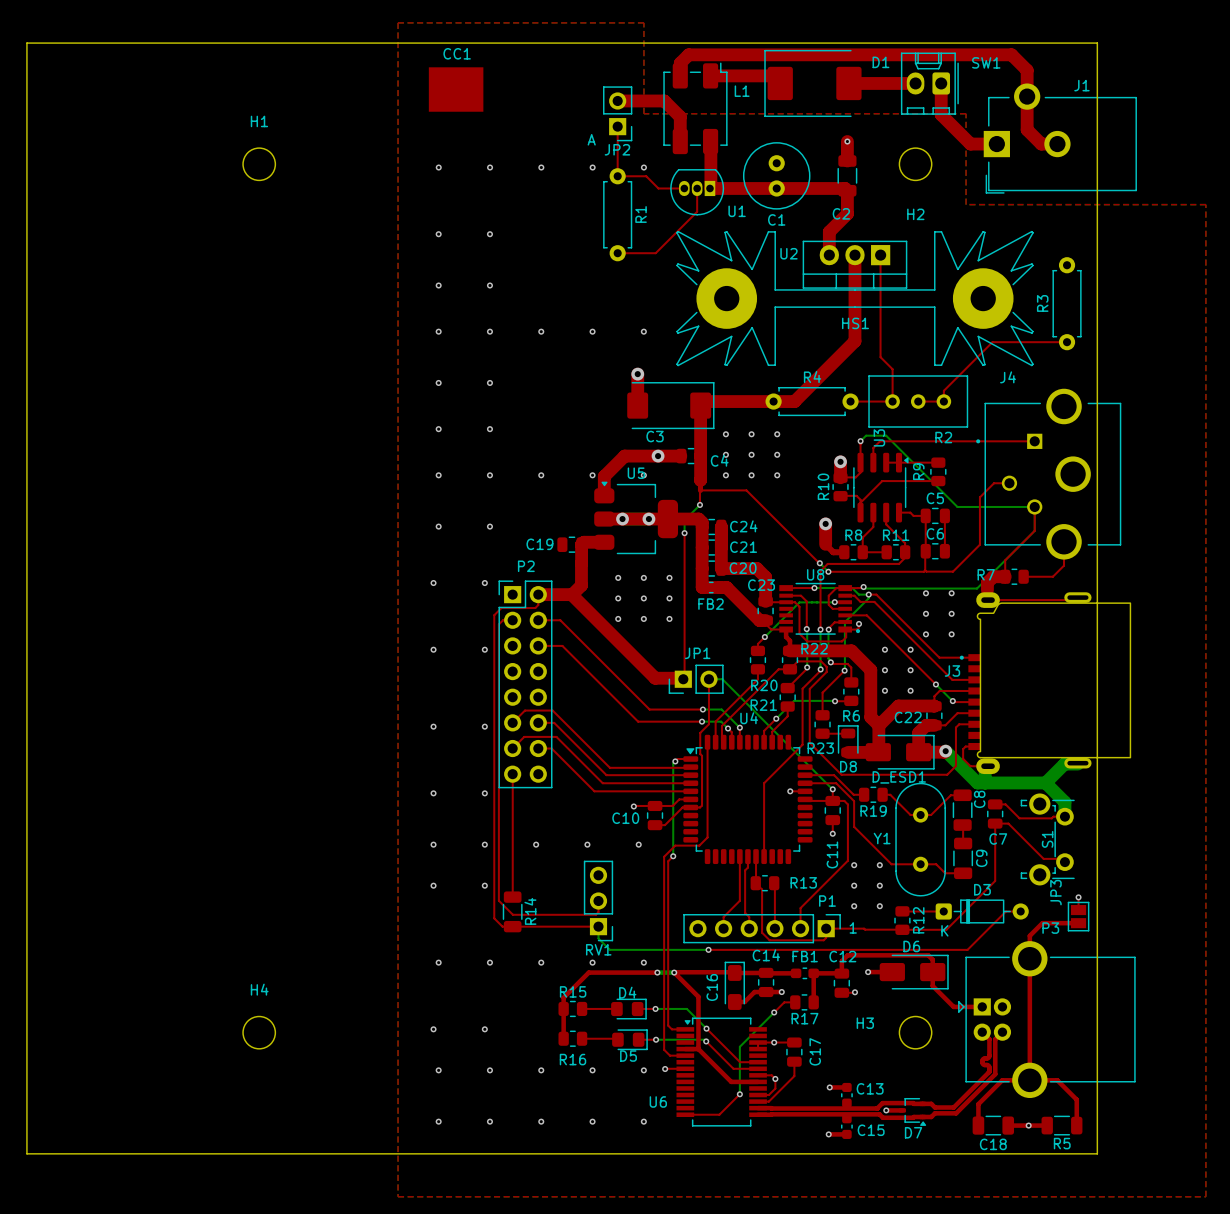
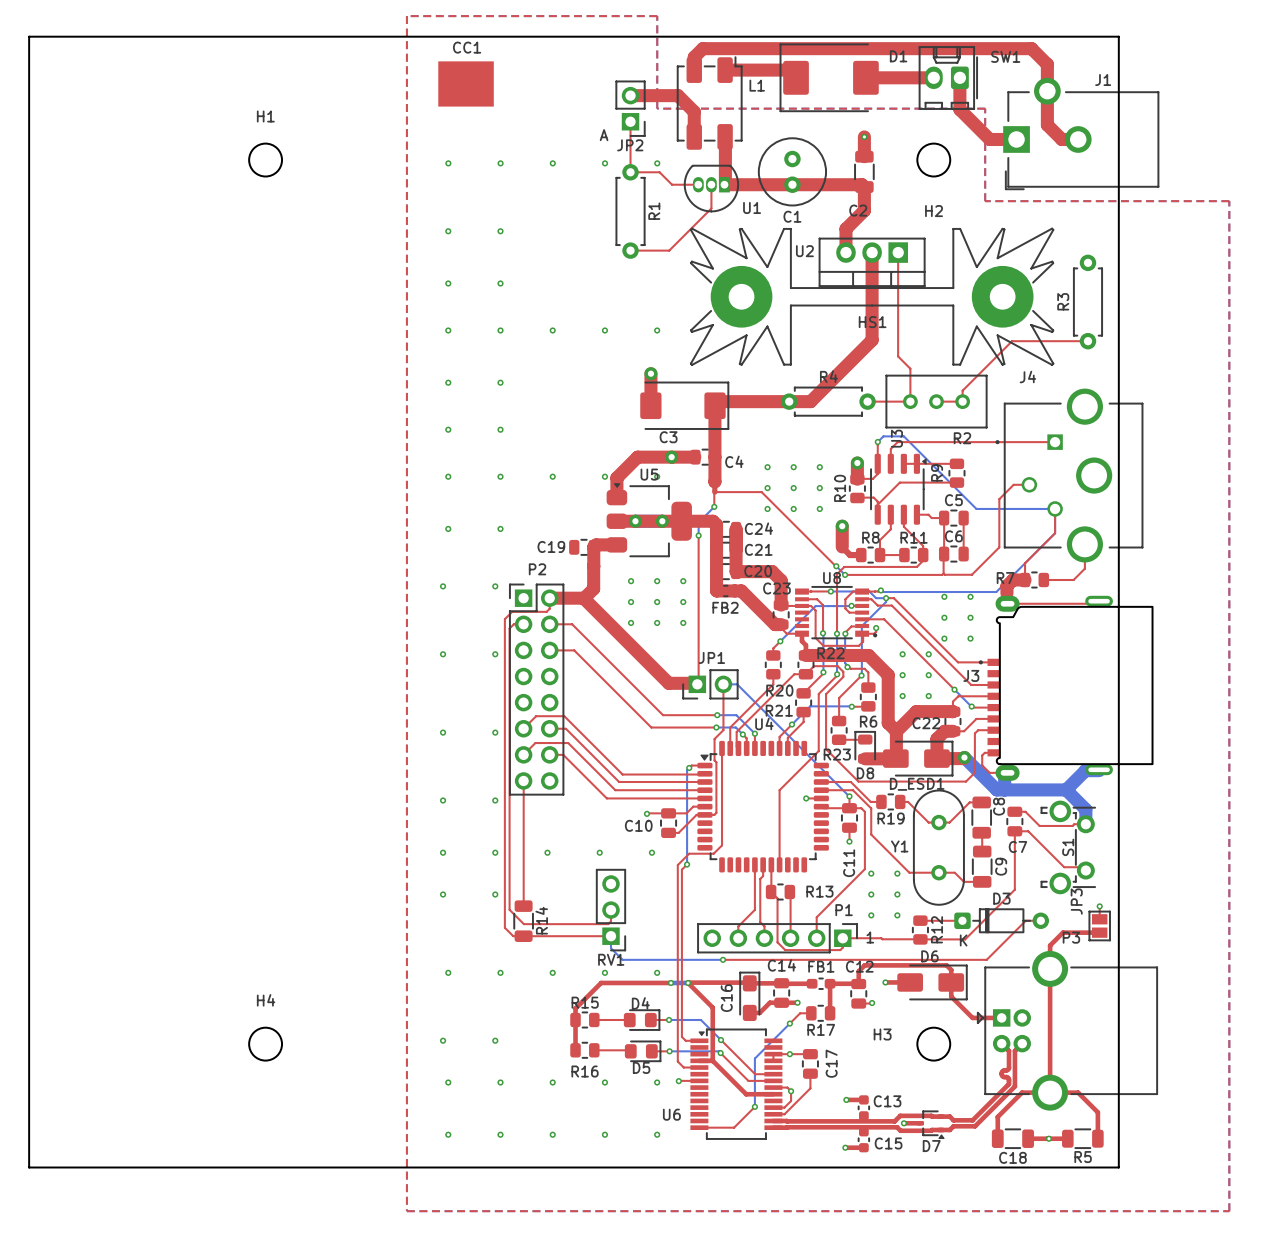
via: (725, 434) -> none
via: (751, 434) -> none
via: (777, 434) -> none
via: (725, 454) -> none
via: (751, 454) -> none
via: (777, 454) -> none
via: none -> (767, 467)
via: none -> (793, 467)
via: none -> (819, 467)
via: (725, 475) -> none
via: (751, 475) -> none
via: (777, 475) -> none
via: none -> (767, 488)
via: none -> (793, 488)
via: none -> (819, 488)
via: none -> (767, 508)
via: none -> (793, 508)
via: none -> (819, 508)

